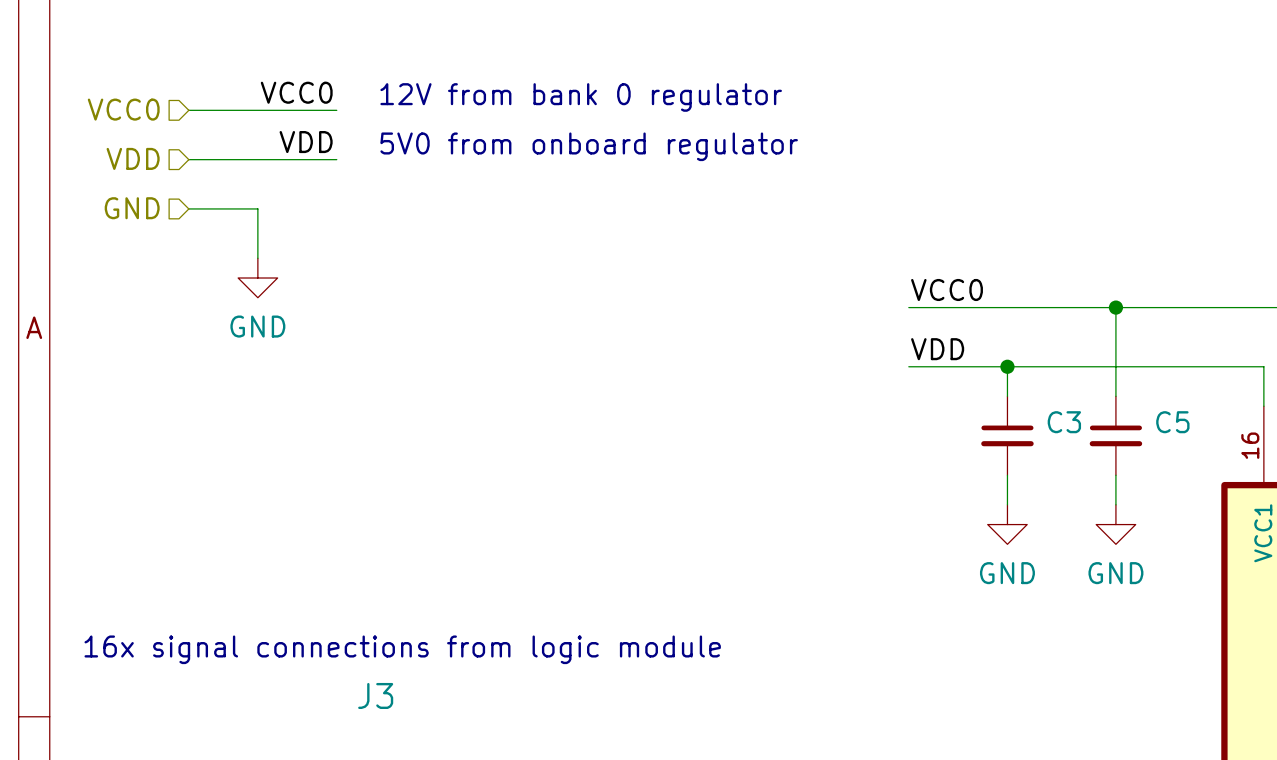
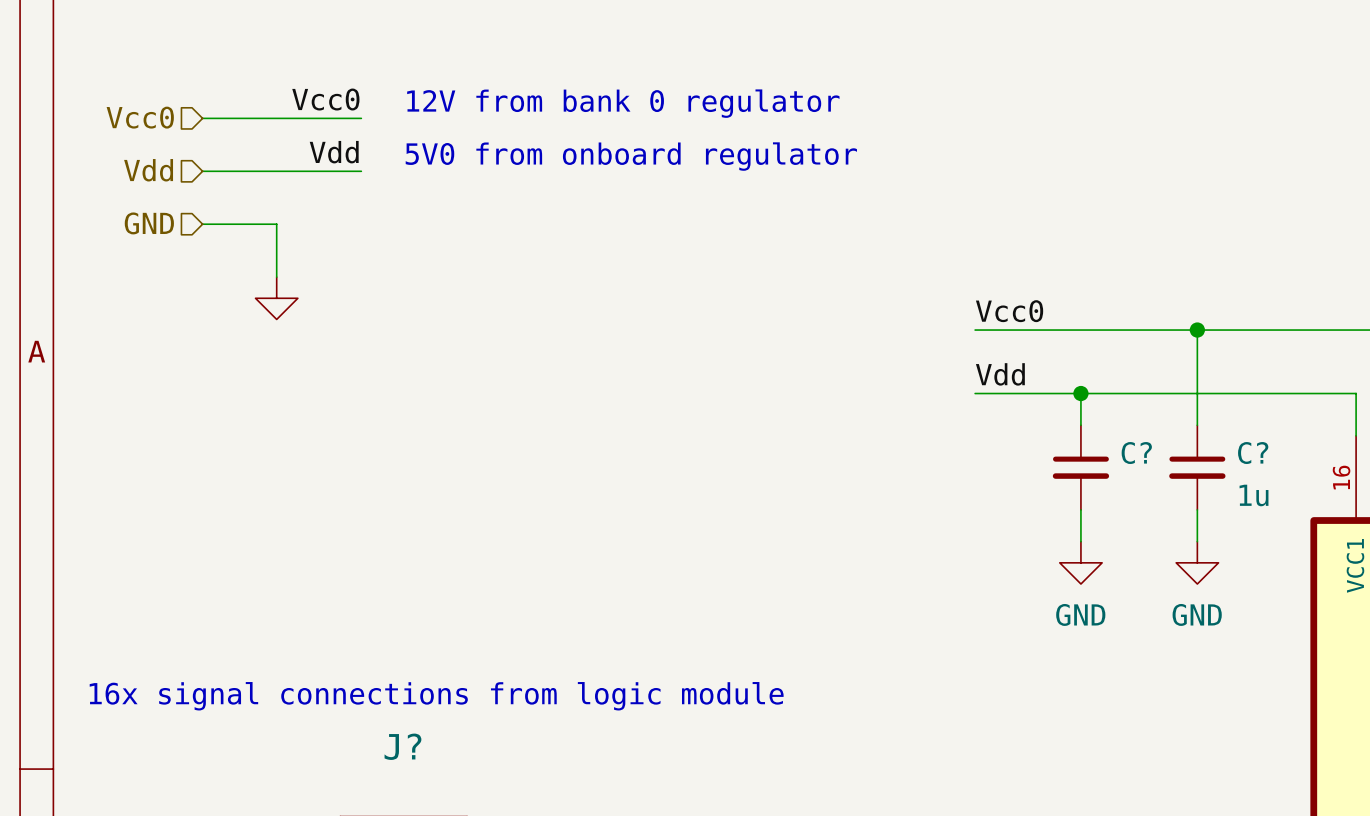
label: VCC0 (296, 92) -> Vcc0 (325, 99)
hierarchical label: VCC0 (123, 109) -> Vcc0 (140, 117)
label: VDD (306, 142) -> Vdd (334, 152)
hierarchical label: VDD (133, 158) -> Vdd (148, 170)
label: VCC0 (947, 289) -> Vcc0 (1009, 311)
power symbol text: GND (257, 326) -> none
label: VDD (937, 349) -> Vdd (1000, 374)
C3 name: C3 (1064, 422) -> C? (1136, 453)
C5 name: C5 (1172, 422) -> C? (1253, 453)
C5 value: none -> 1u (1254, 495)
J3 name: J3 (375, 695) -> J? (402, 746)

